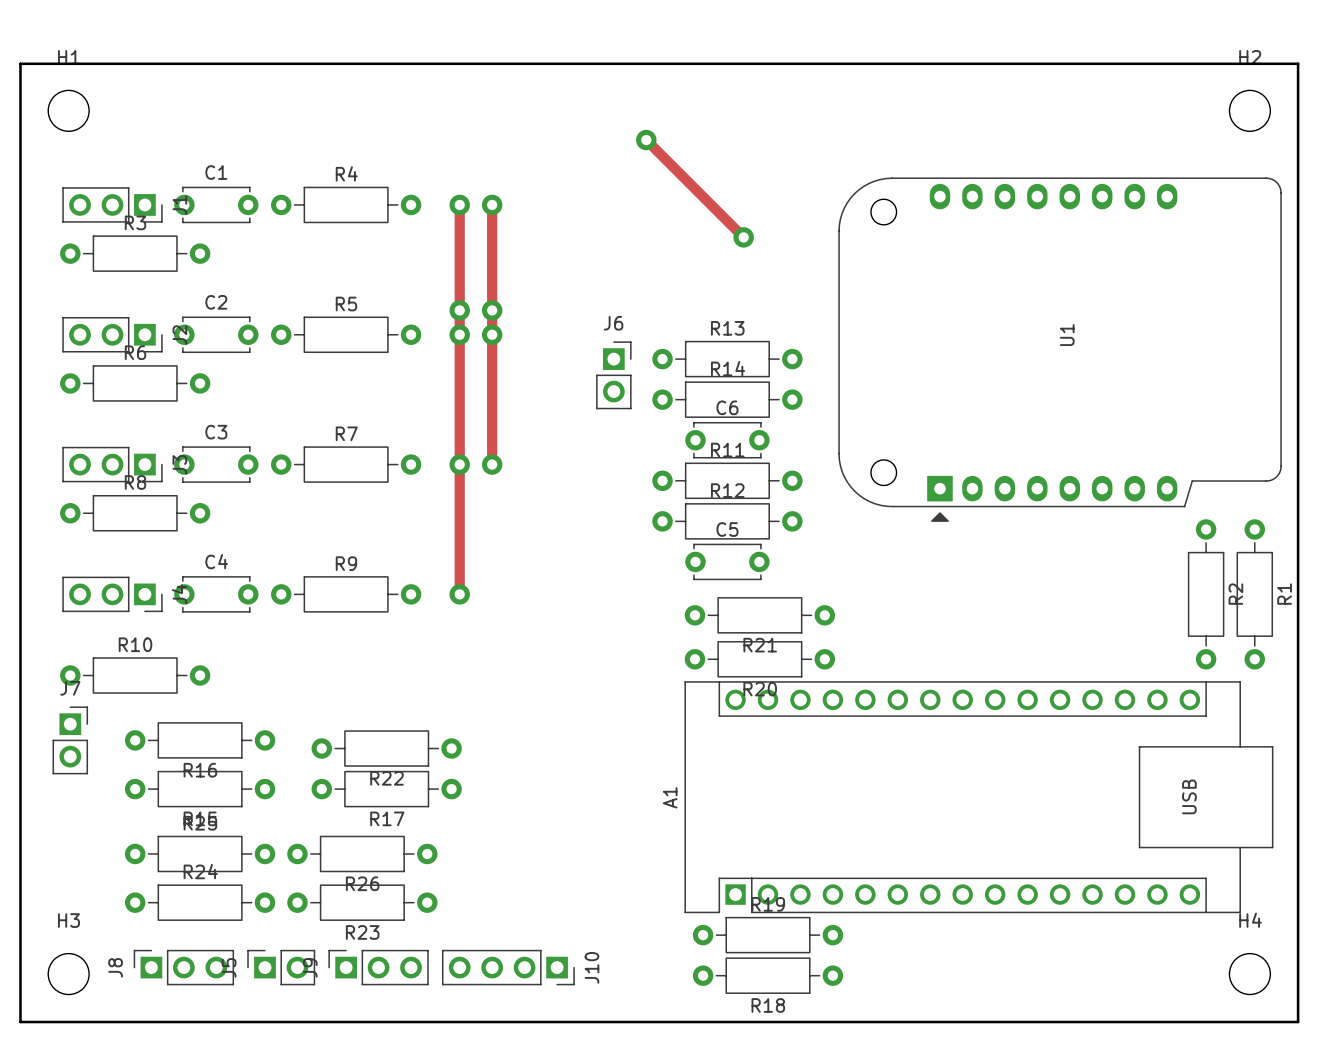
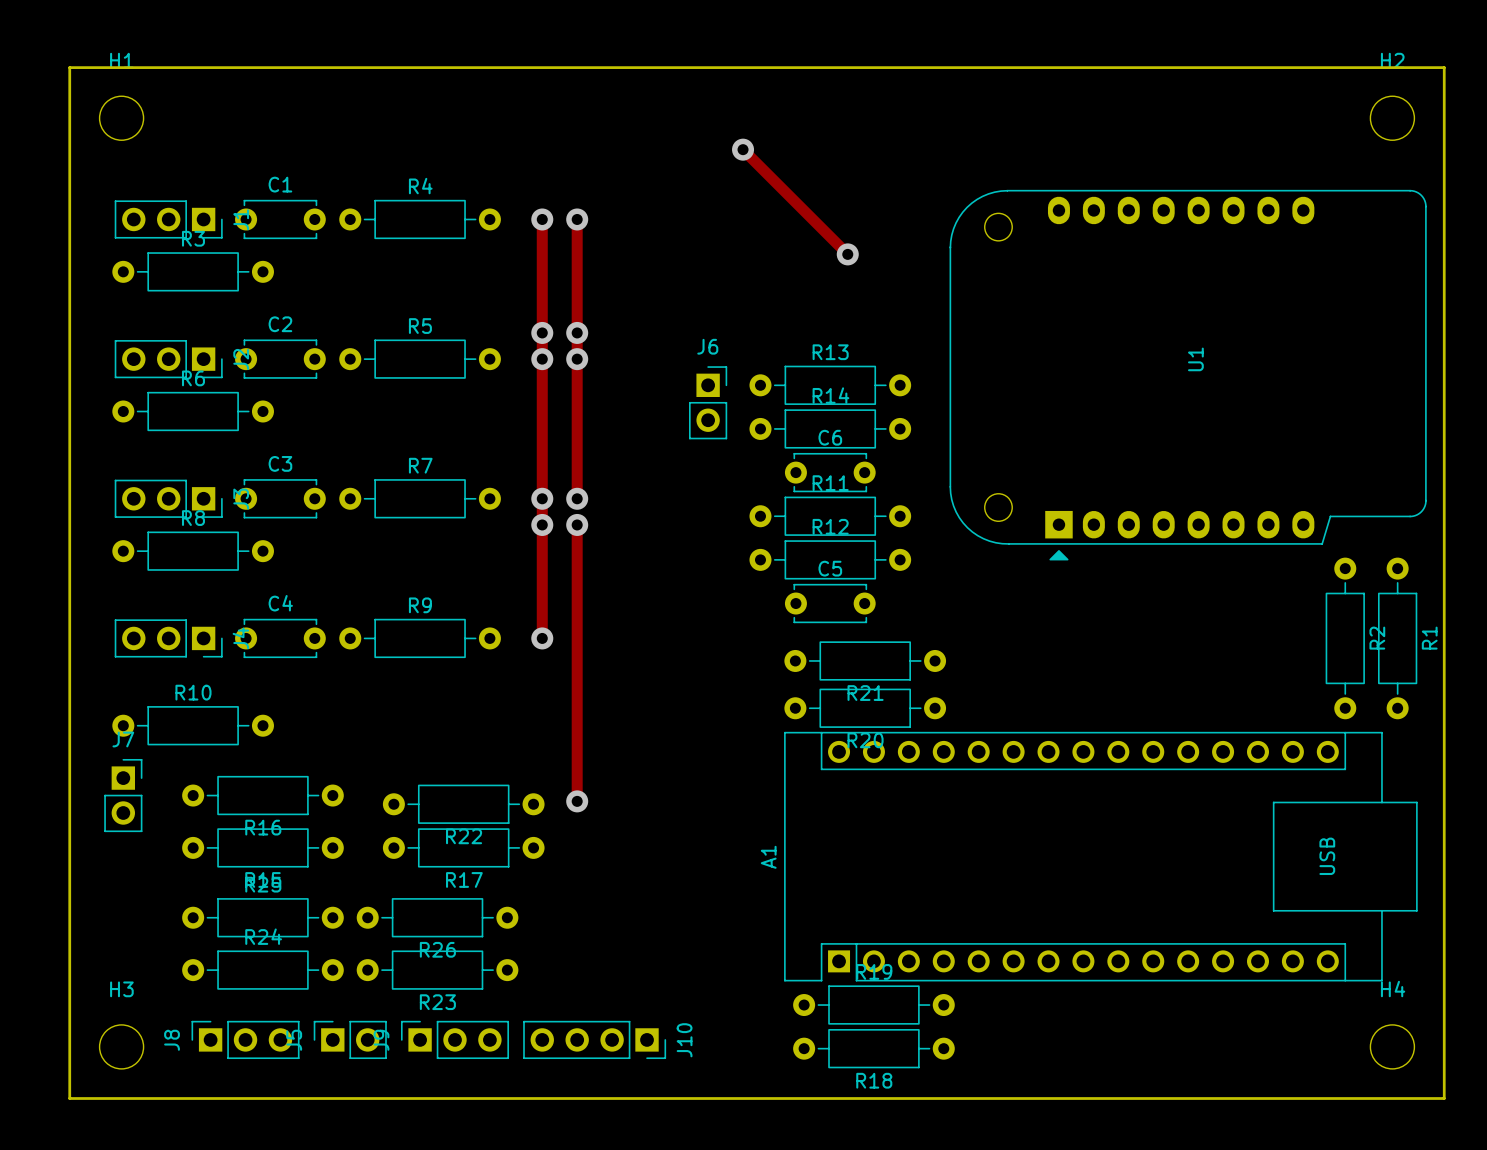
via: none -> (542, 524)
track: none -> (577, 524) (577, 801)
via: none -> (577, 524)
via: none -> (577, 801)

